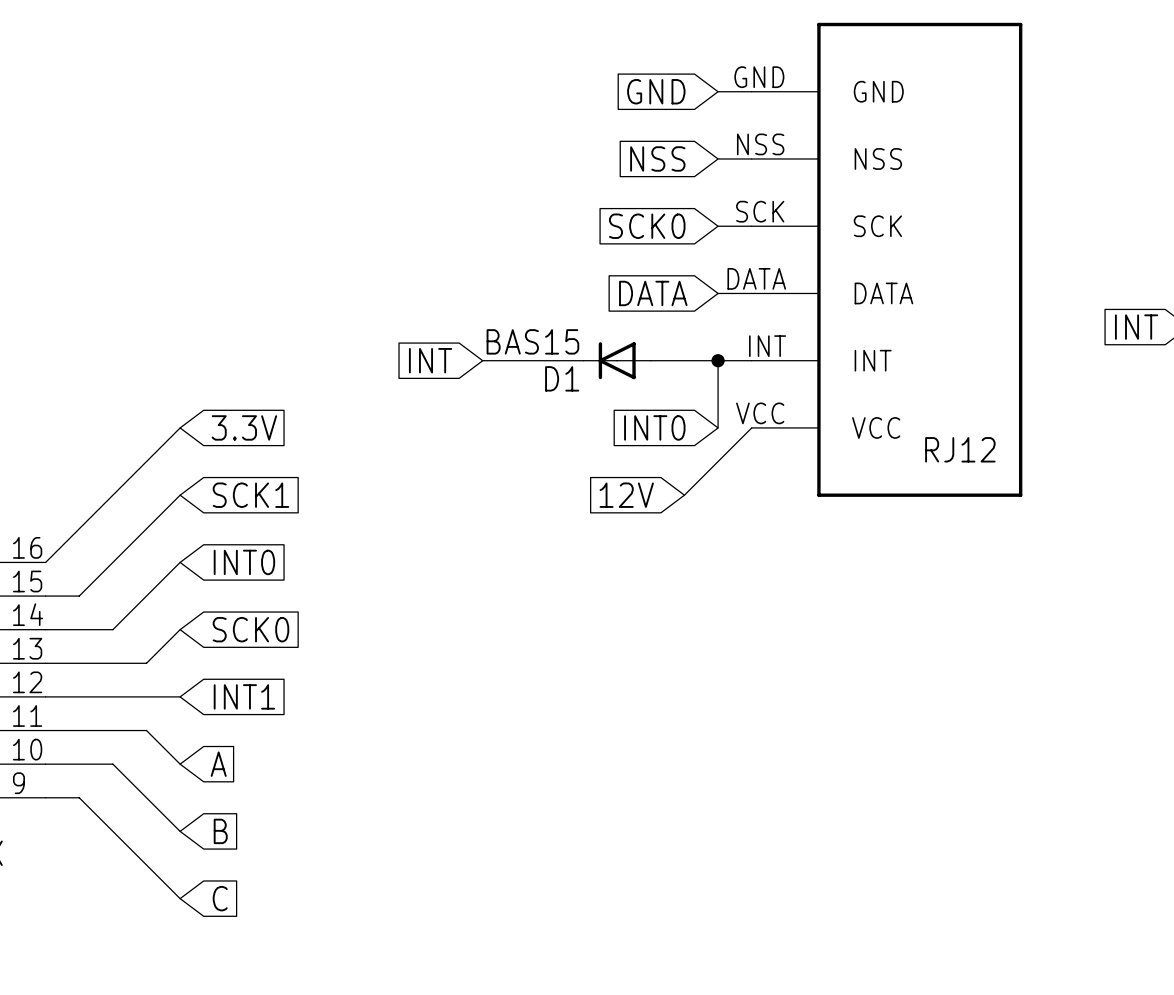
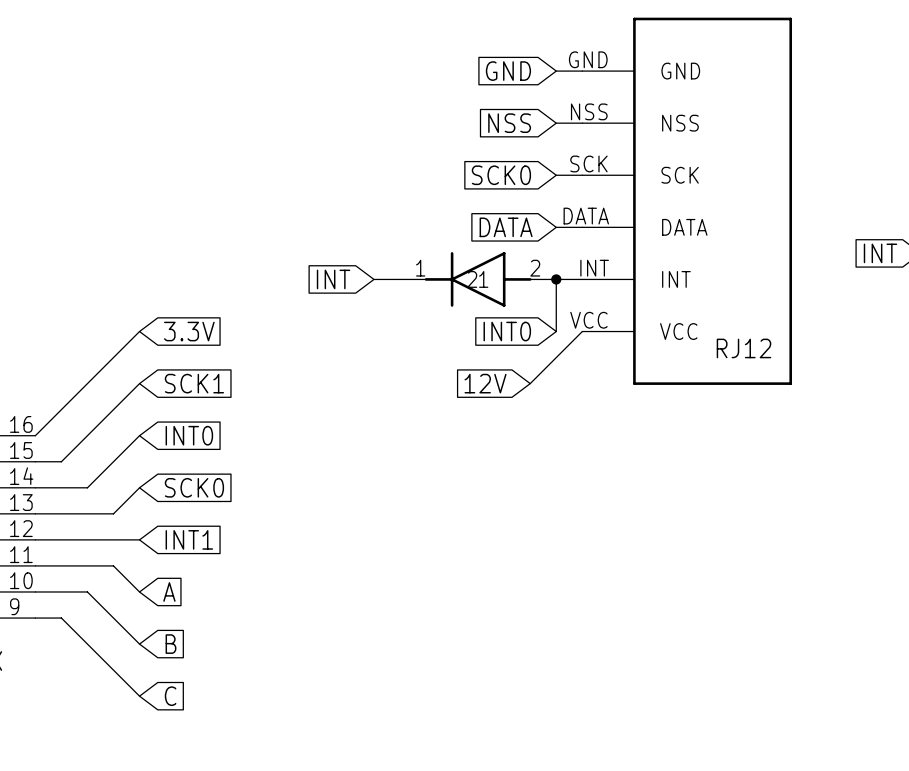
D1: BAS15 (617, 360) -> none
part: none -> (478, 279)

